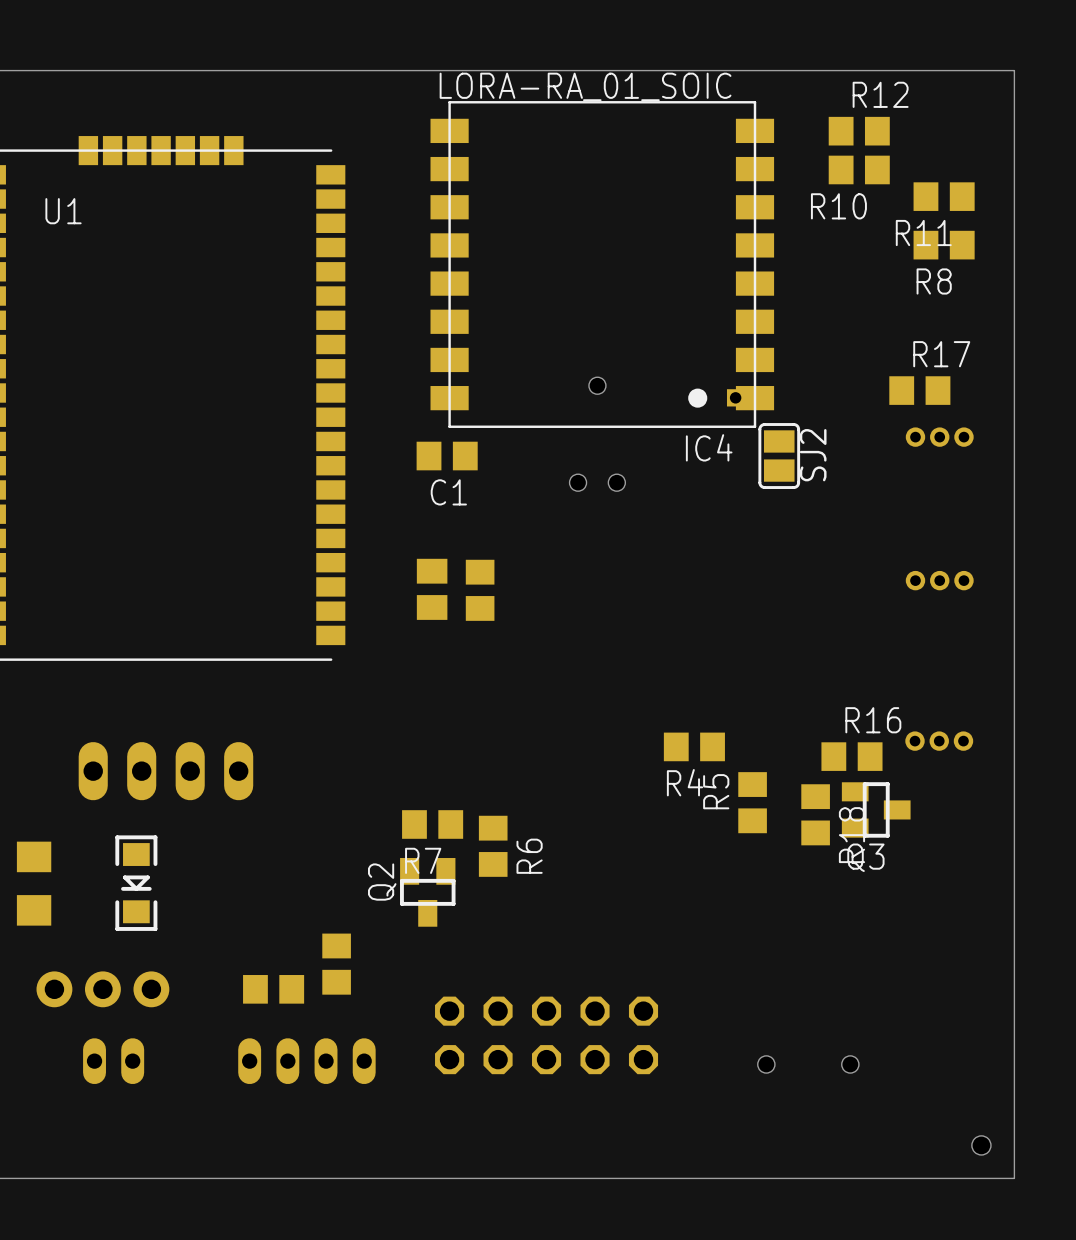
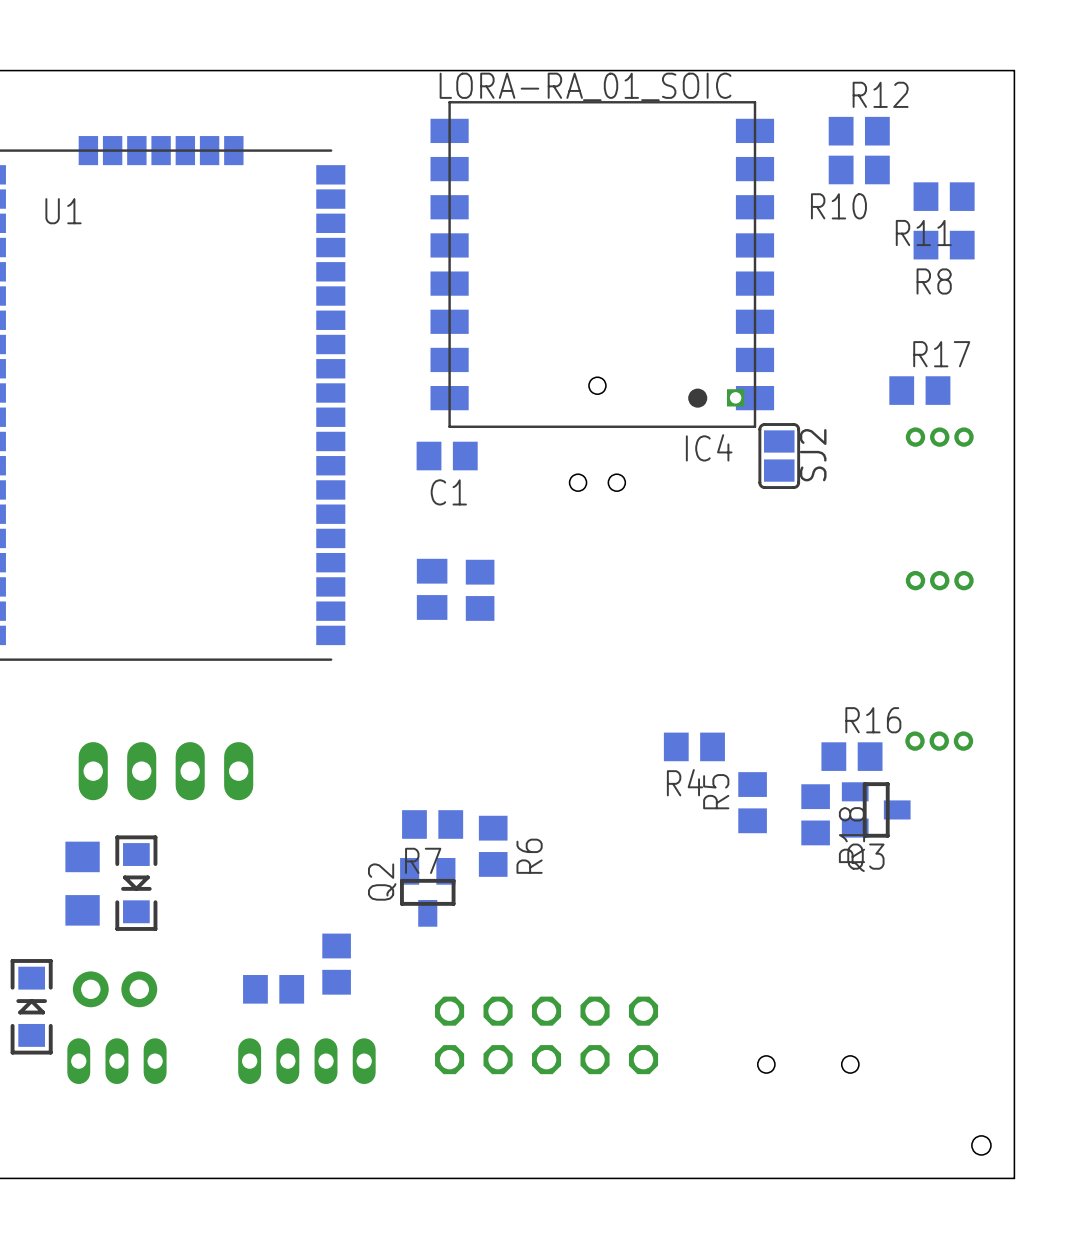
part position: (34, 883) -> (82, 883)
part footprint: [36, 971, 170, 1008] -> [72, 971, 158, 1008]
part: none -> (31, 1006)
part footprint: [83, 1038, 145, 1085] -> [67, 1038, 167, 1085]

